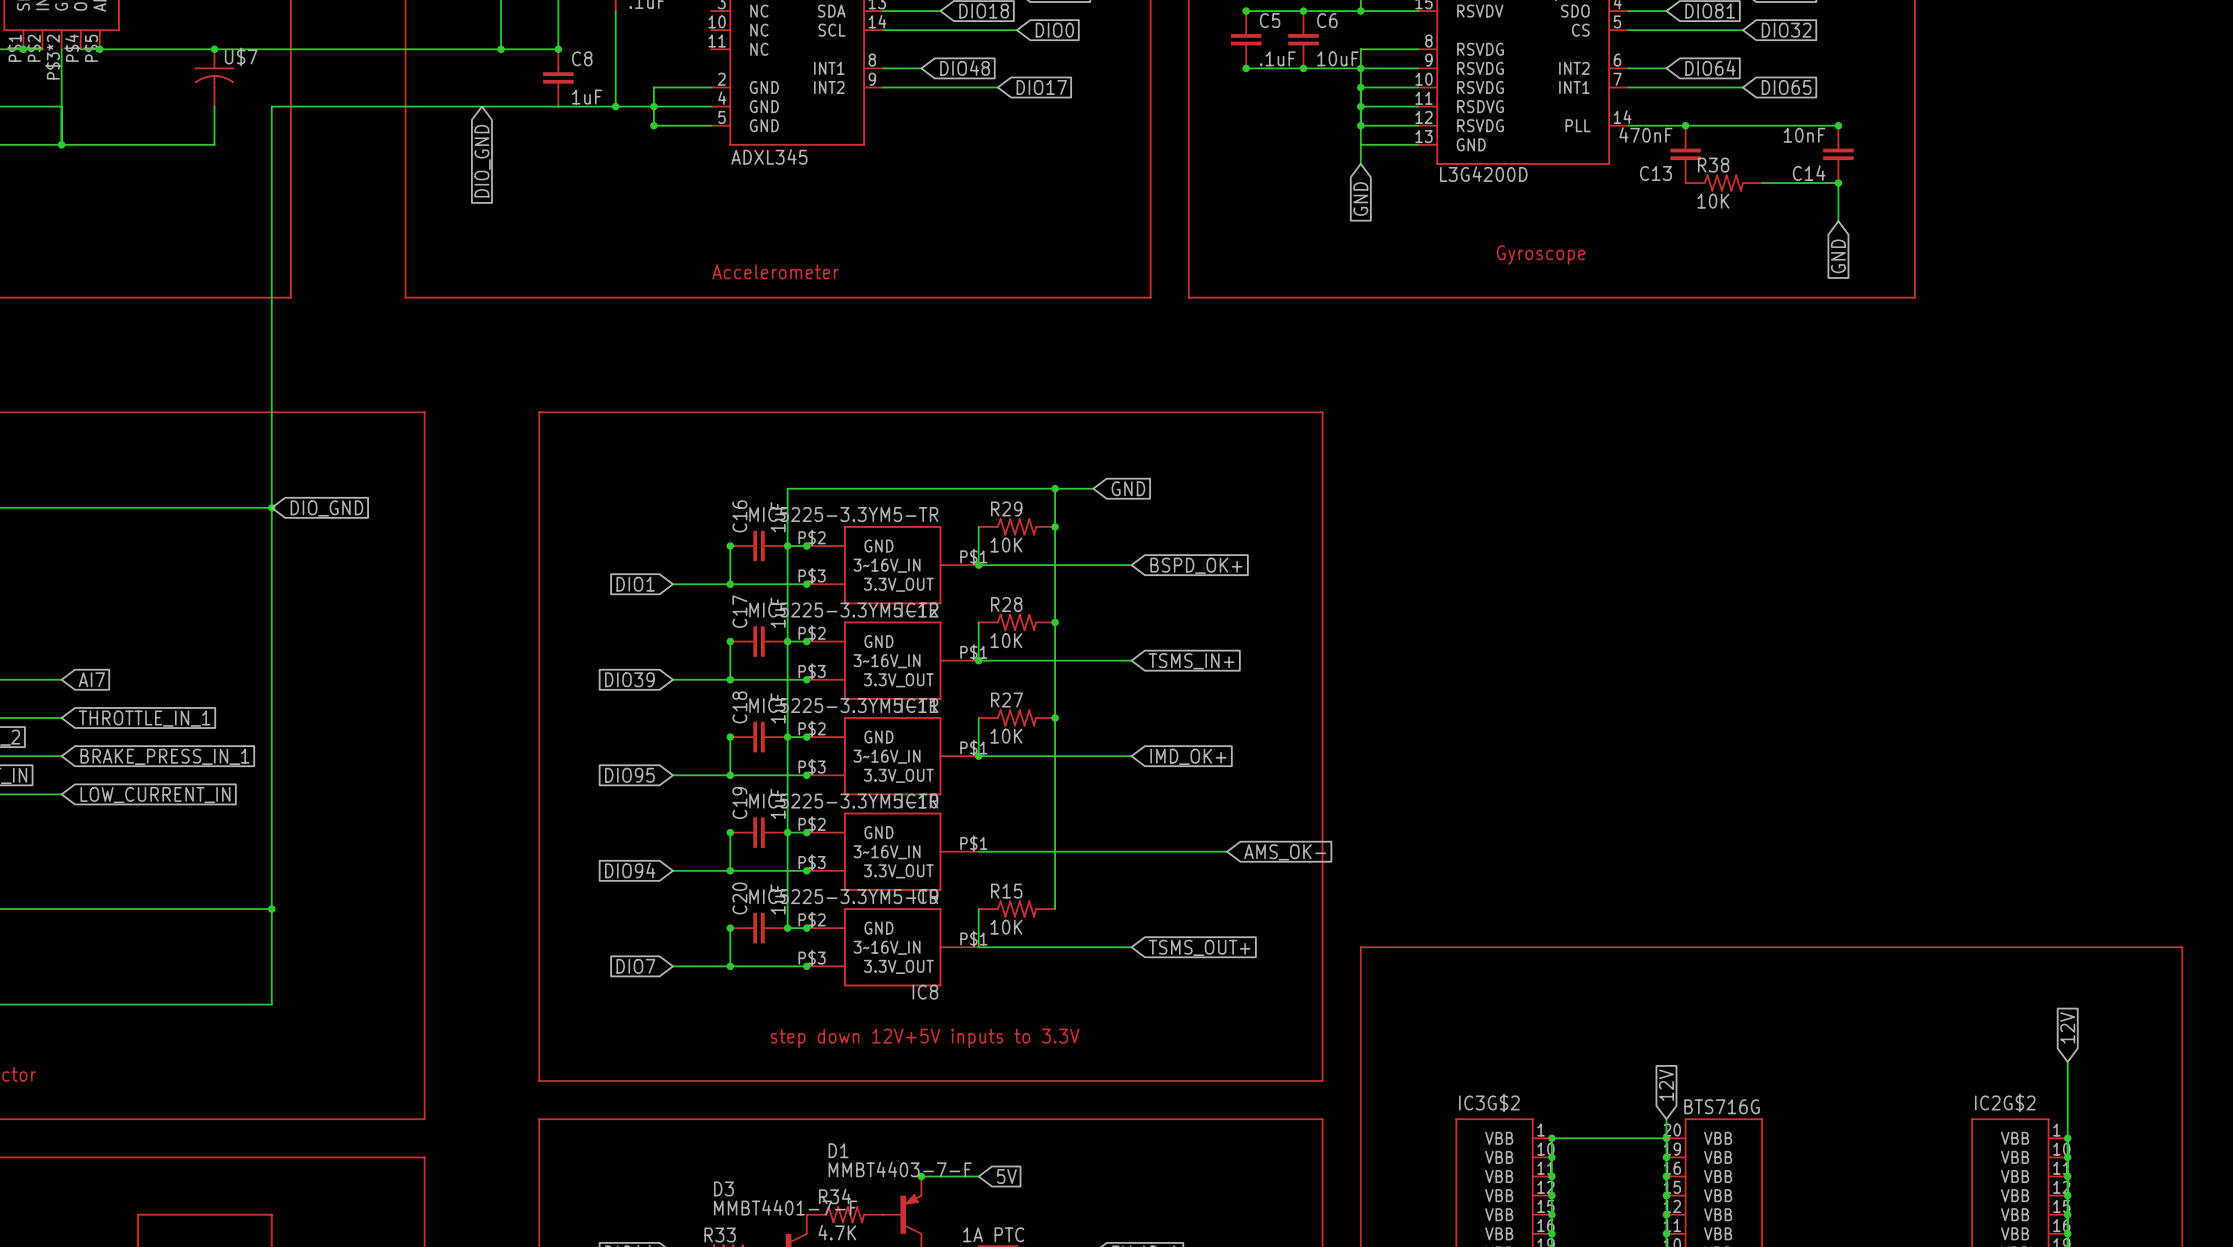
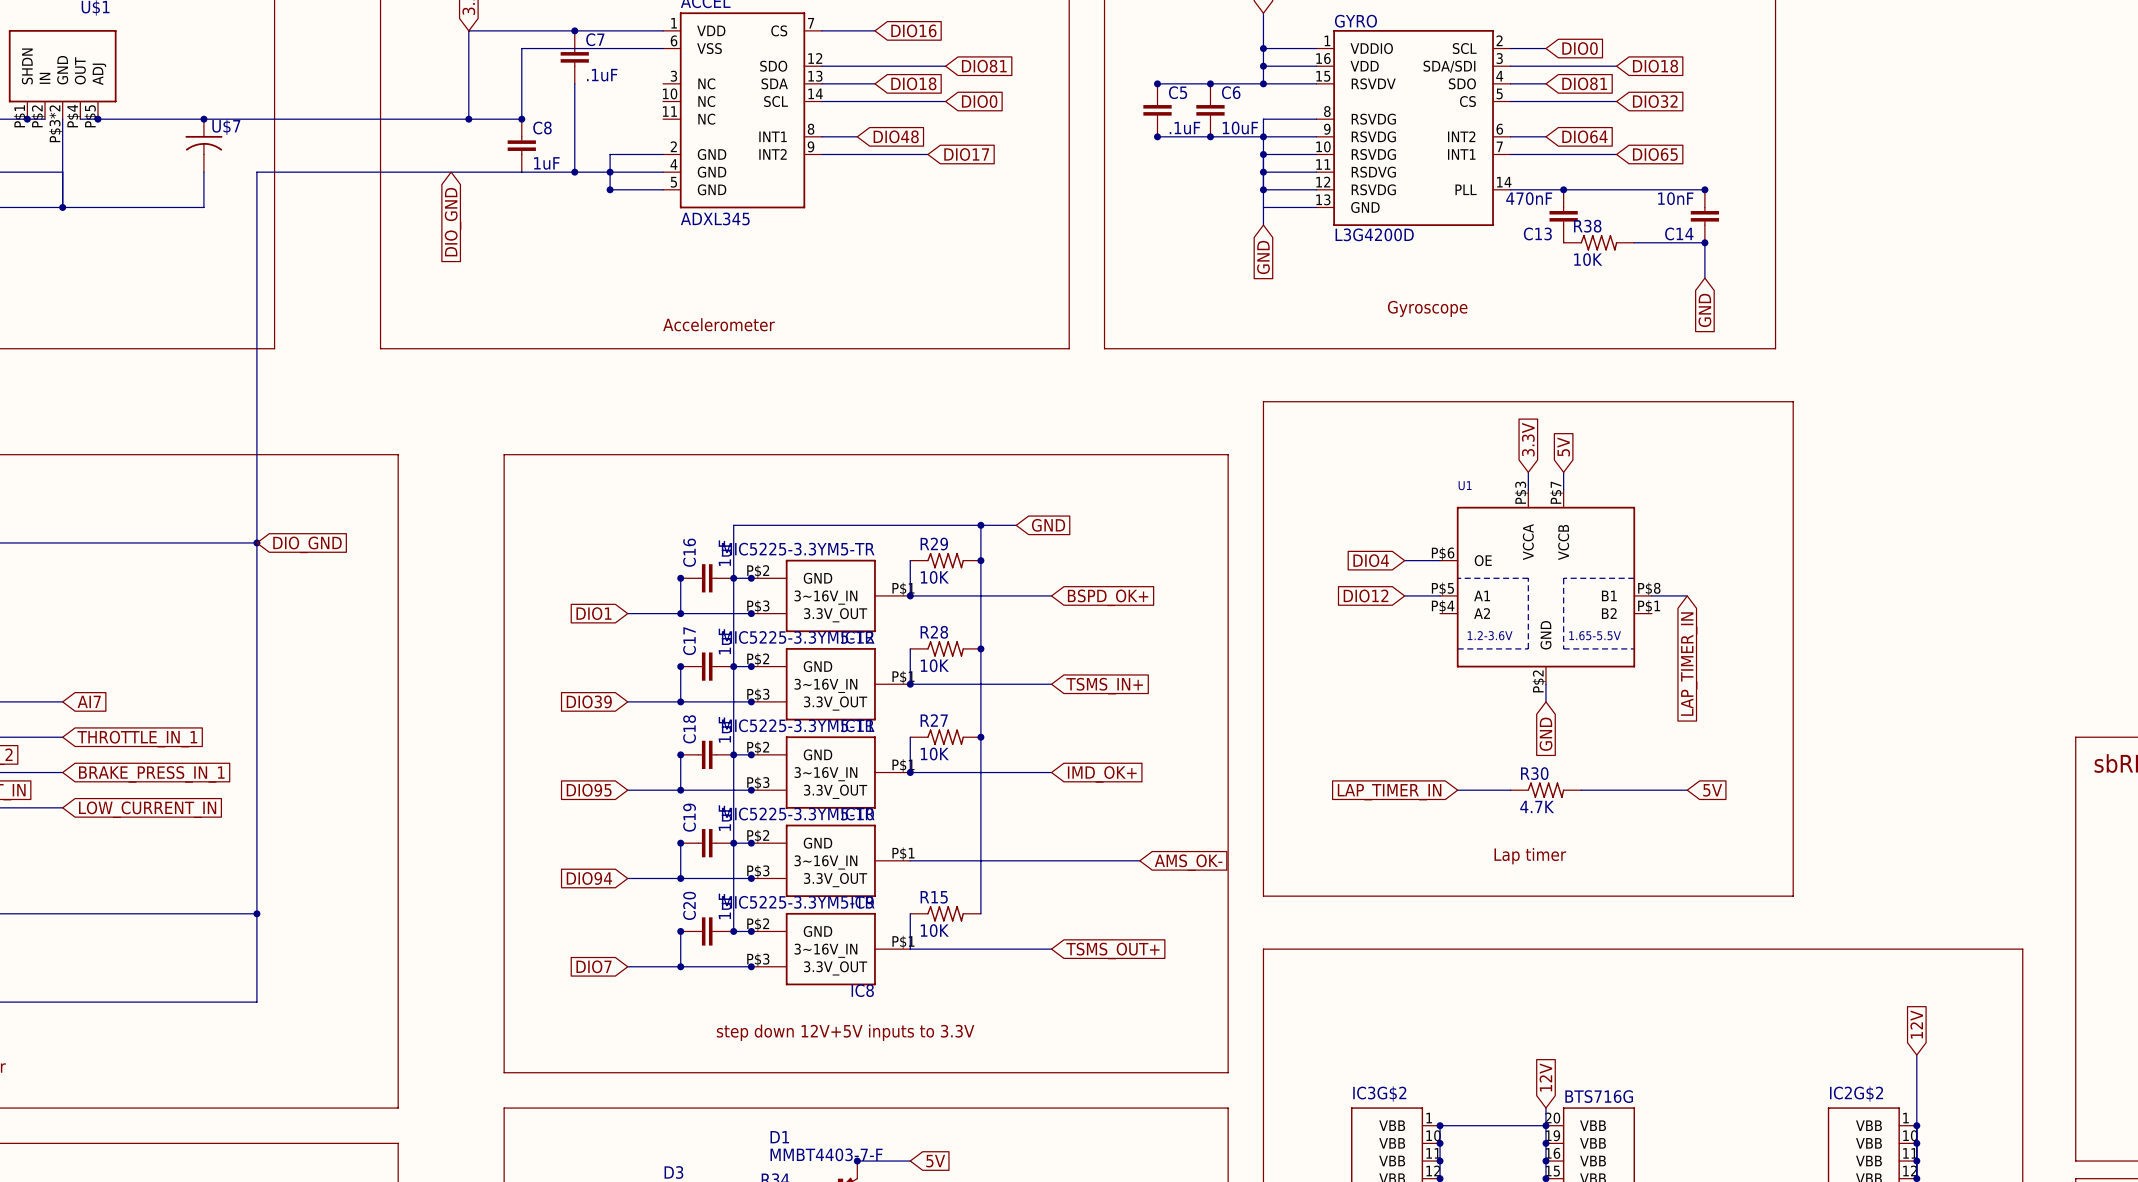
line: none -> (1263, 401) (1793, 401) (1793, 896) (1263, 896) (1263, 401)
global label: none -> 3.3V (1528, 439)
global label: none -> 5V (1563, 446)
wire: none -> (1528, 472) (1528, 490)
wire: none -> (1563, 472) (1563, 490)
global label: none -> DIO4 (1371, 560)
wire: none -> (1404, 560) (1440, 560)
U1: none -> (1545, 587)
global label: none -> DIO12 (1366, 595)
wire: none -> (1404, 595) (1440, 595)
wire: none -> (1651, 595) (1687, 595)
global label: none -> LAP_TIMER_IN (1689, 664)
wire: none -> (1545, 684) (1545, 701)
global label: none -> GND (1545, 734)
global label: none -> LAP_TIMER_IN (1389, 792)
wire: none -> (1457, 790) (1510, 790)
R30: none -> 4.7K (1545, 790)
wire: none -> (1581, 790) (1687, 790)
global label: none -> 5V (1712, 790)
text: none -> Lap timer (1530, 856)

